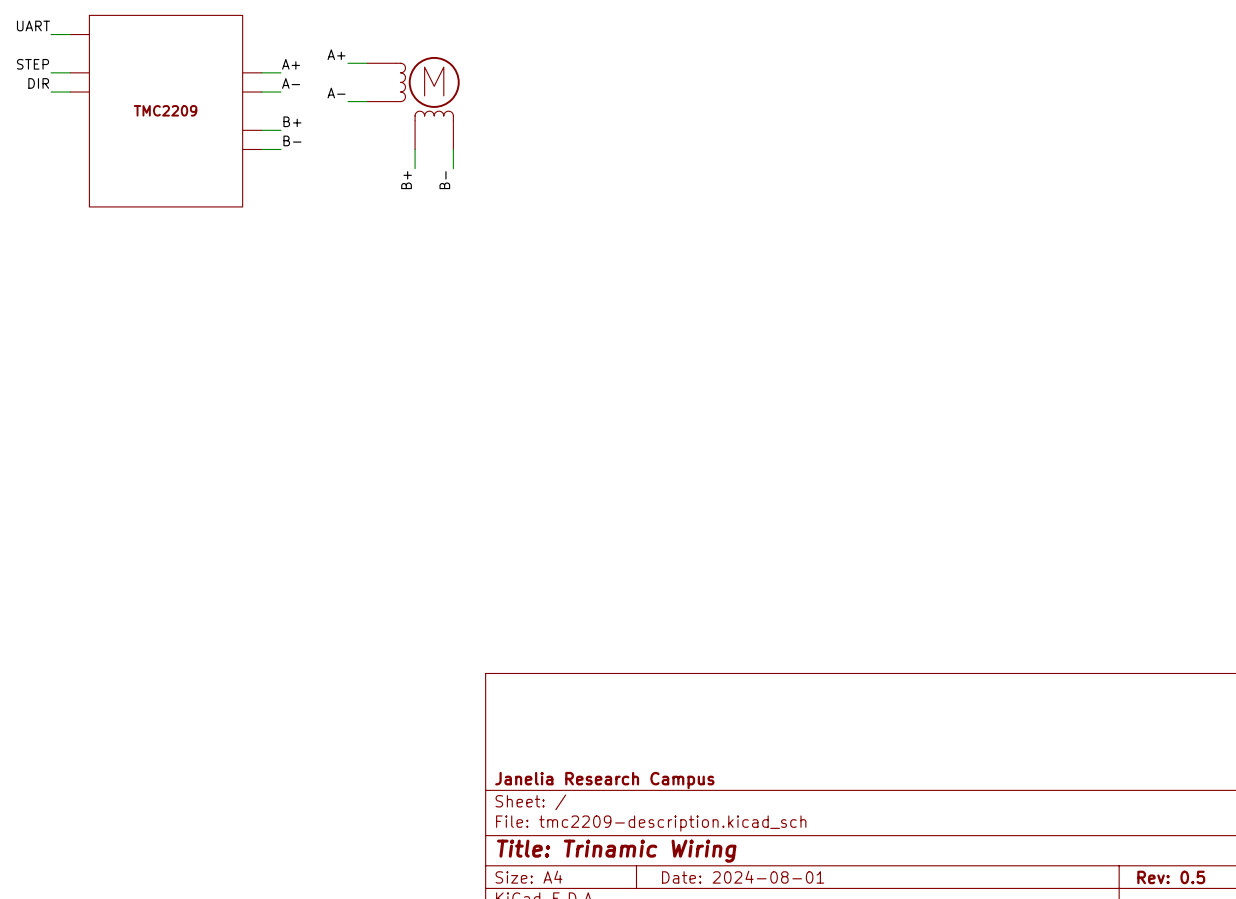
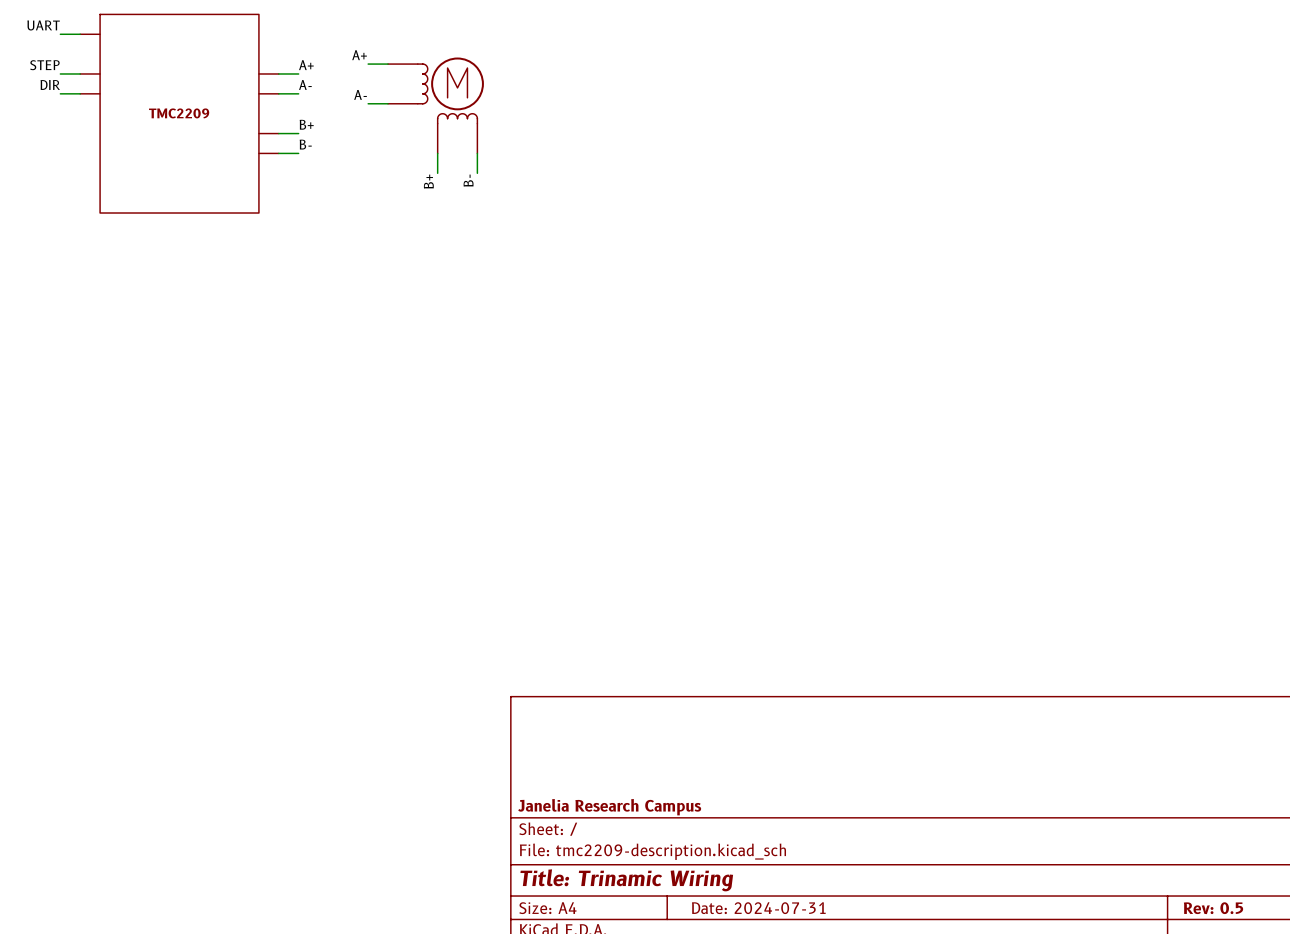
title block: Date: 2024-08-01 (743, 877) -> Date: 2024-07-31 (758, 908)

